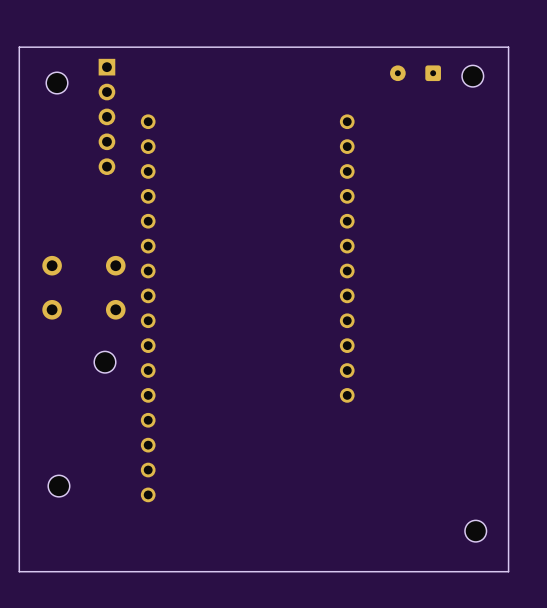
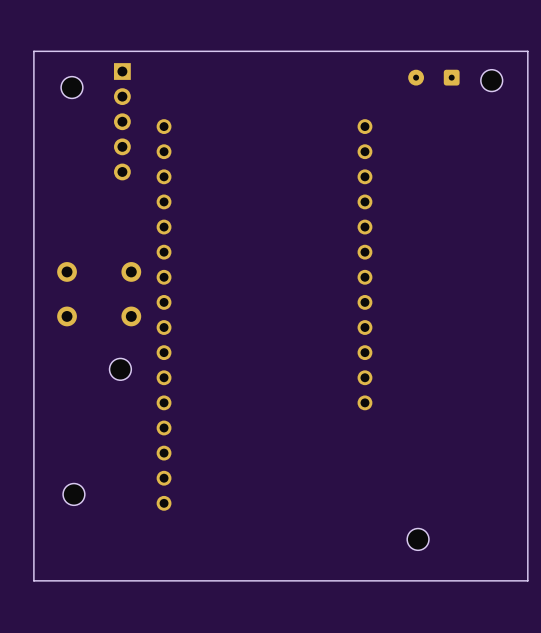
part position: (475, 531) -> (418, 539)

